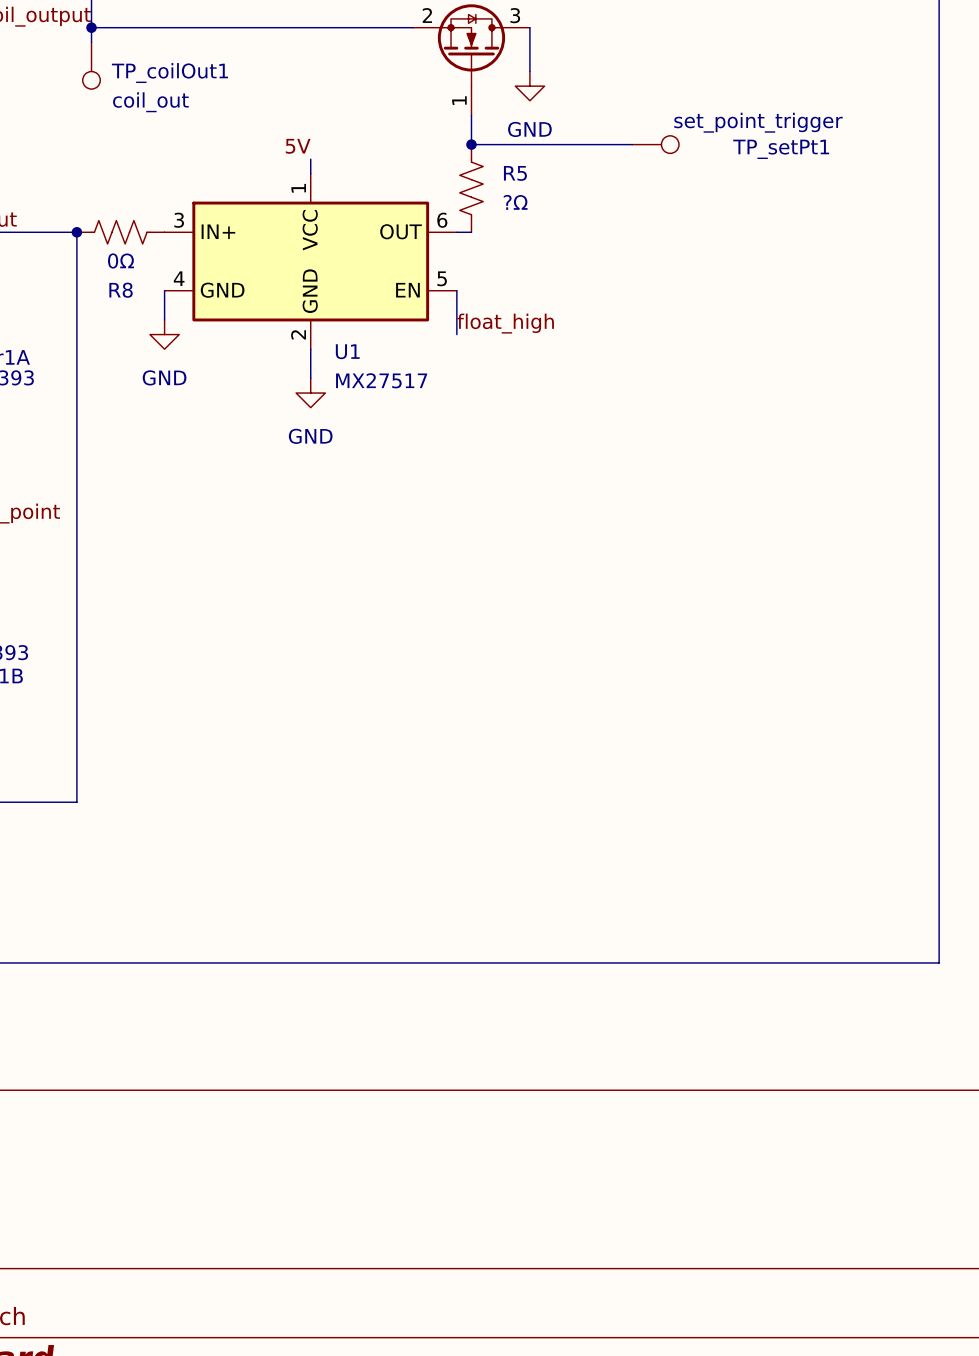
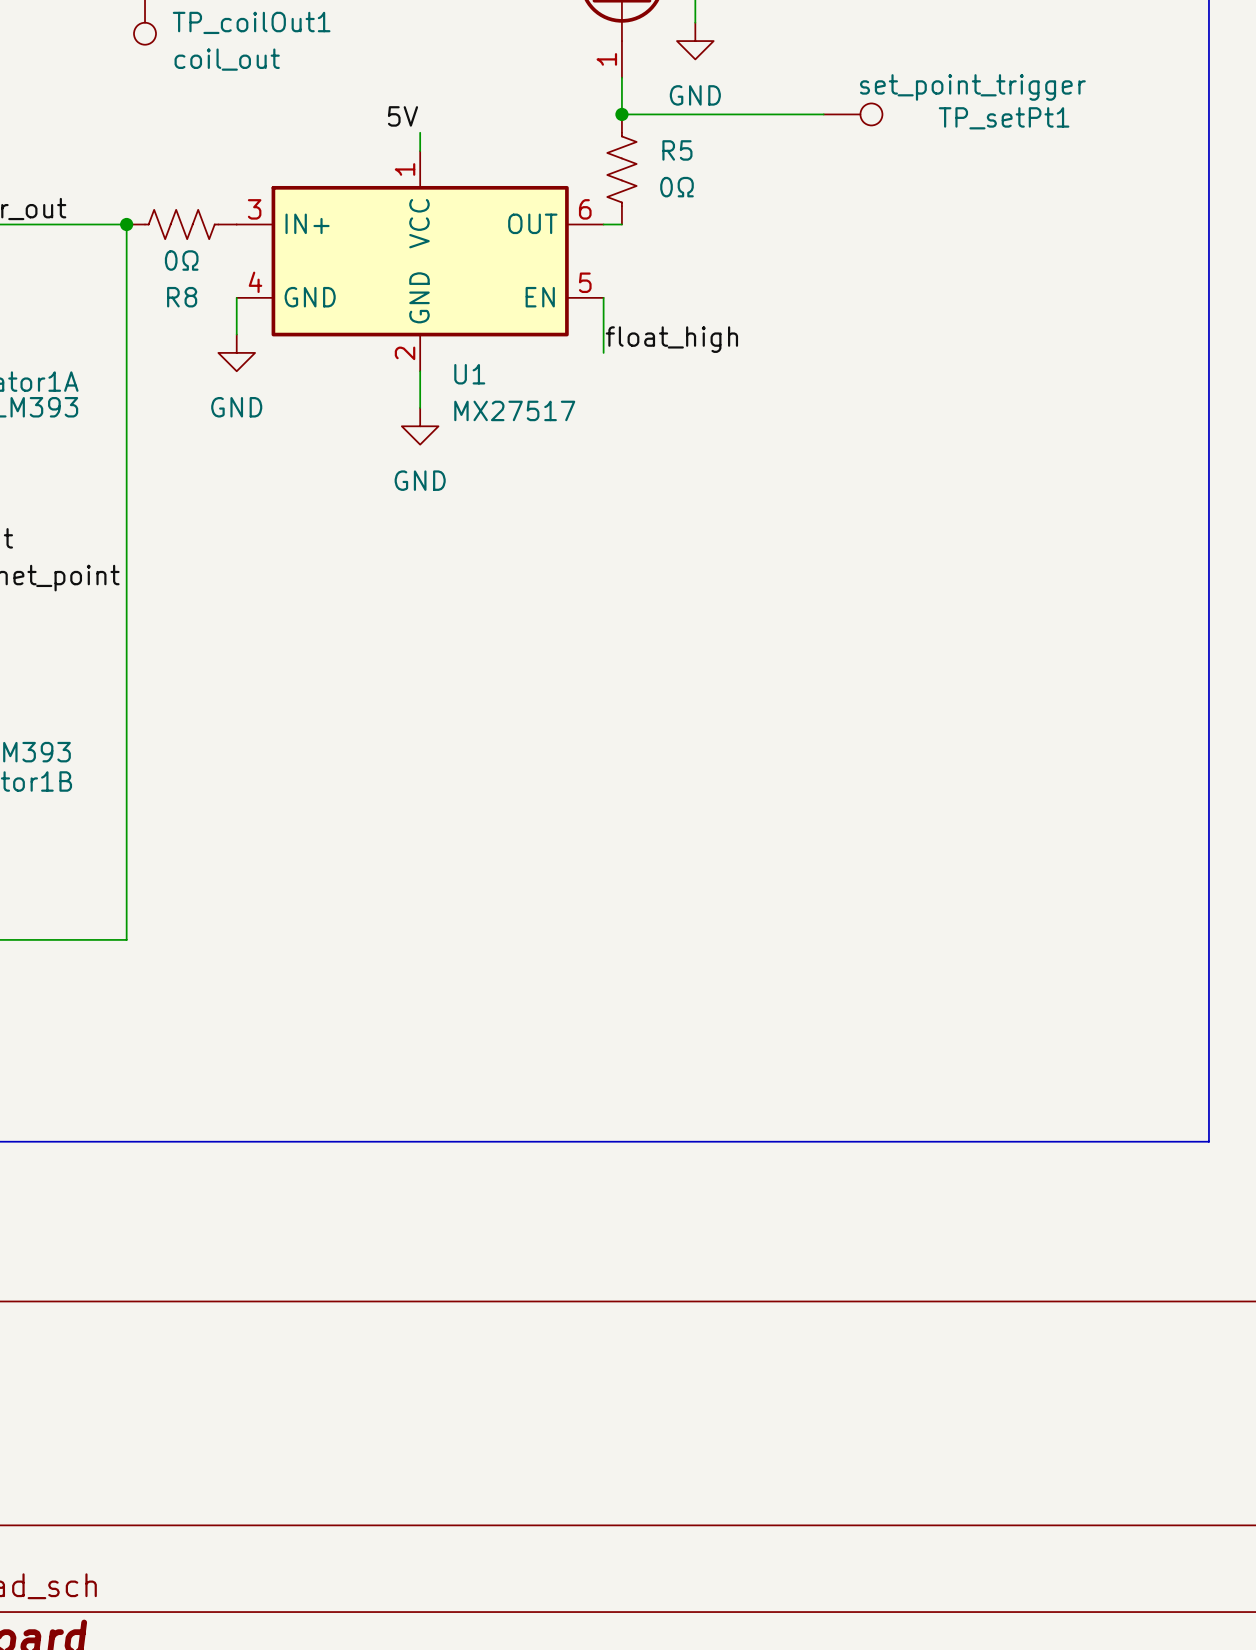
R5 value: ?Ω (515, 202) -> 0Ω (676, 187)

